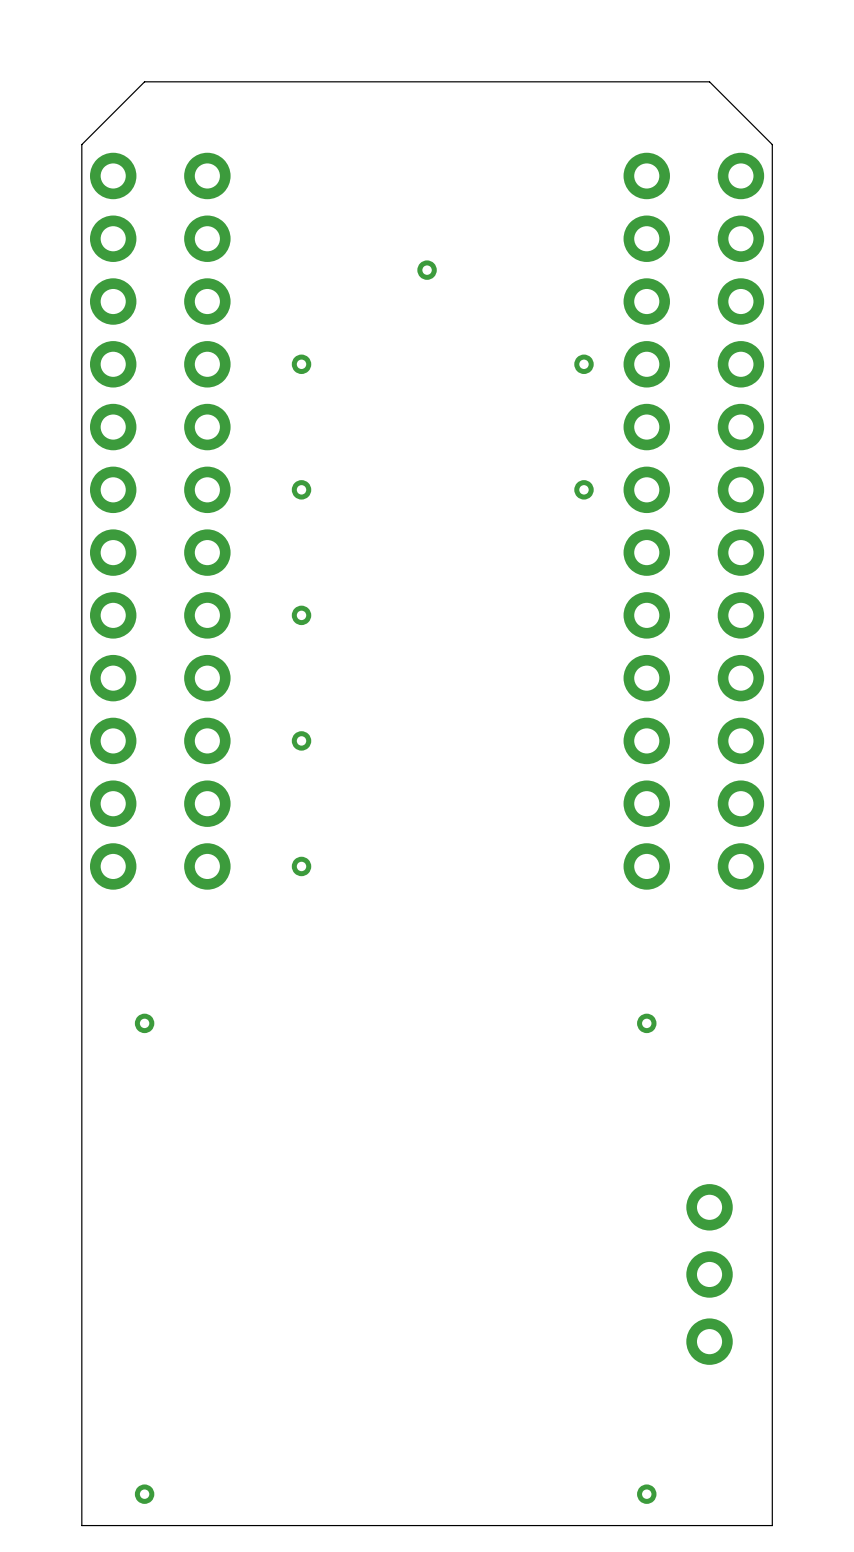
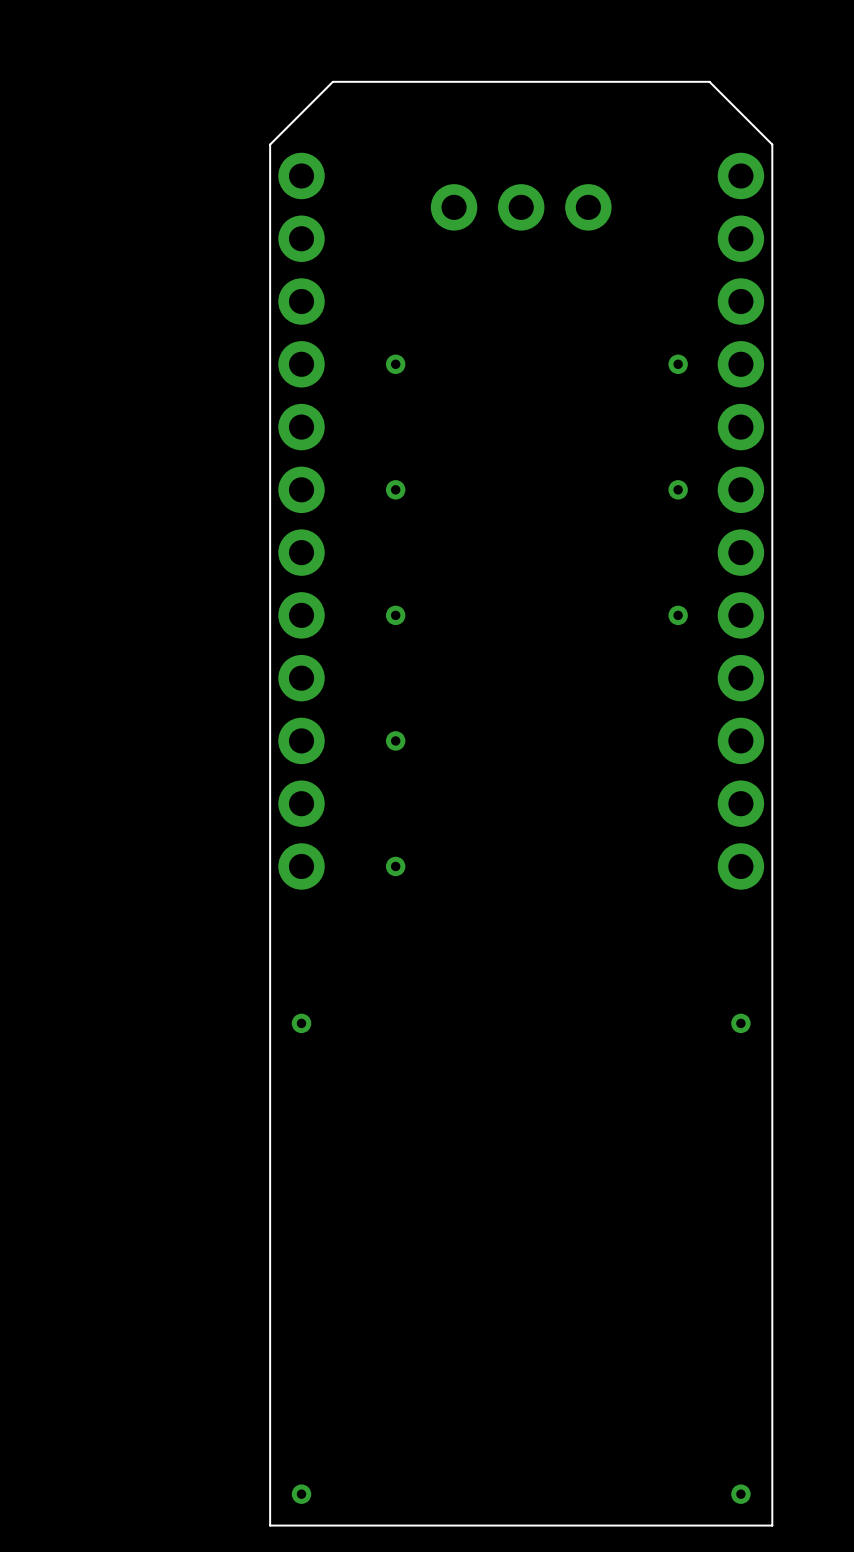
board edge: (332, 81) (144, 81) (81, 144) (81, 1525) (270, 1525) -> (332, 81) (270, 144) (270, 1525)
part: none -> (521, 207)
via: (427, 270) -> none
via: (301, 364) -> none
via: none -> (395, 364)
via: (583, 364) -> none
via: none -> (678, 364)
via: (301, 489) -> none
via: none -> (395, 489)
via: (583, 489) -> none
via: none -> (678, 489)
part: (113, 521) -> none
part: (207, 521) -> none
part: none -> (301, 521)
part: (646, 521) -> none
via: (301, 615) -> none
via: none -> (395, 615)
via: none -> (678, 615)
via: (301, 740) -> none
via: none -> (395, 740)
via: (301, 866) -> none
via: none -> (395, 866)
via: (144, 1023) -> none
via: none -> (301, 1023)
via position: (646, 1023) -> (740, 1023)
part: (709, 1274) -> none
via: (144, 1494) -> none
via: none -> (301, 1494)
via position: (646, 1494) -> (740, 1494)

